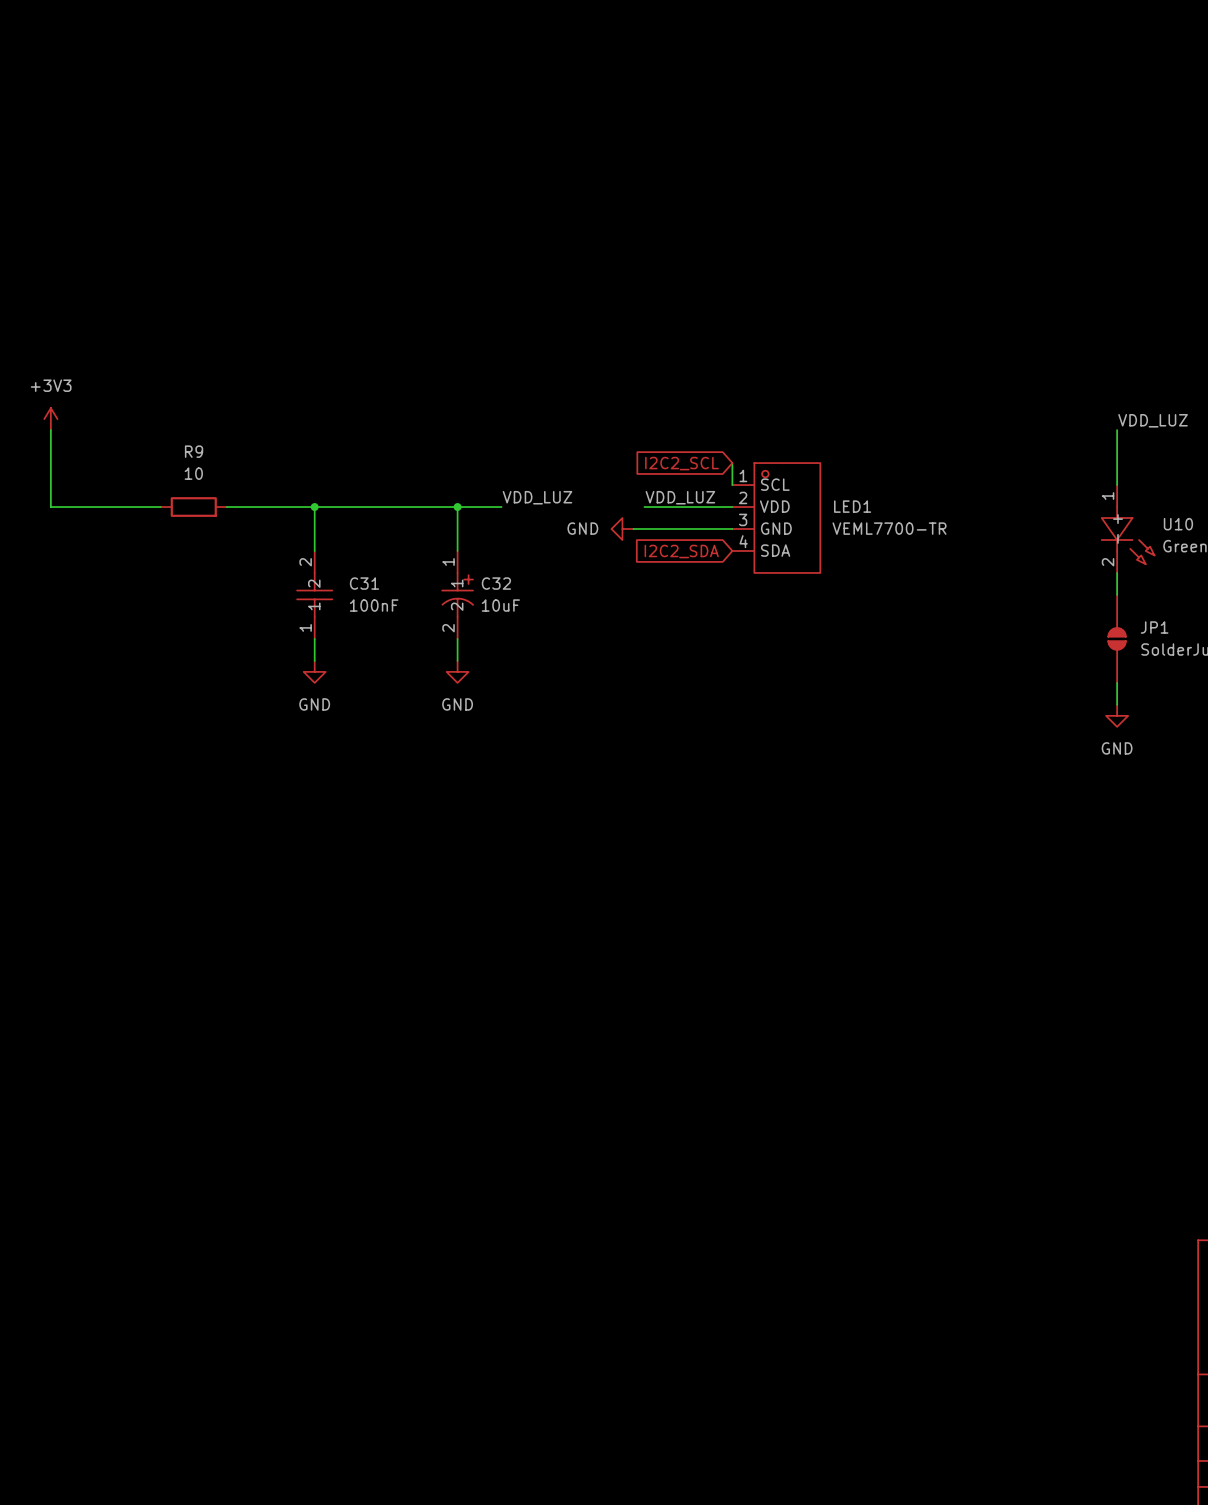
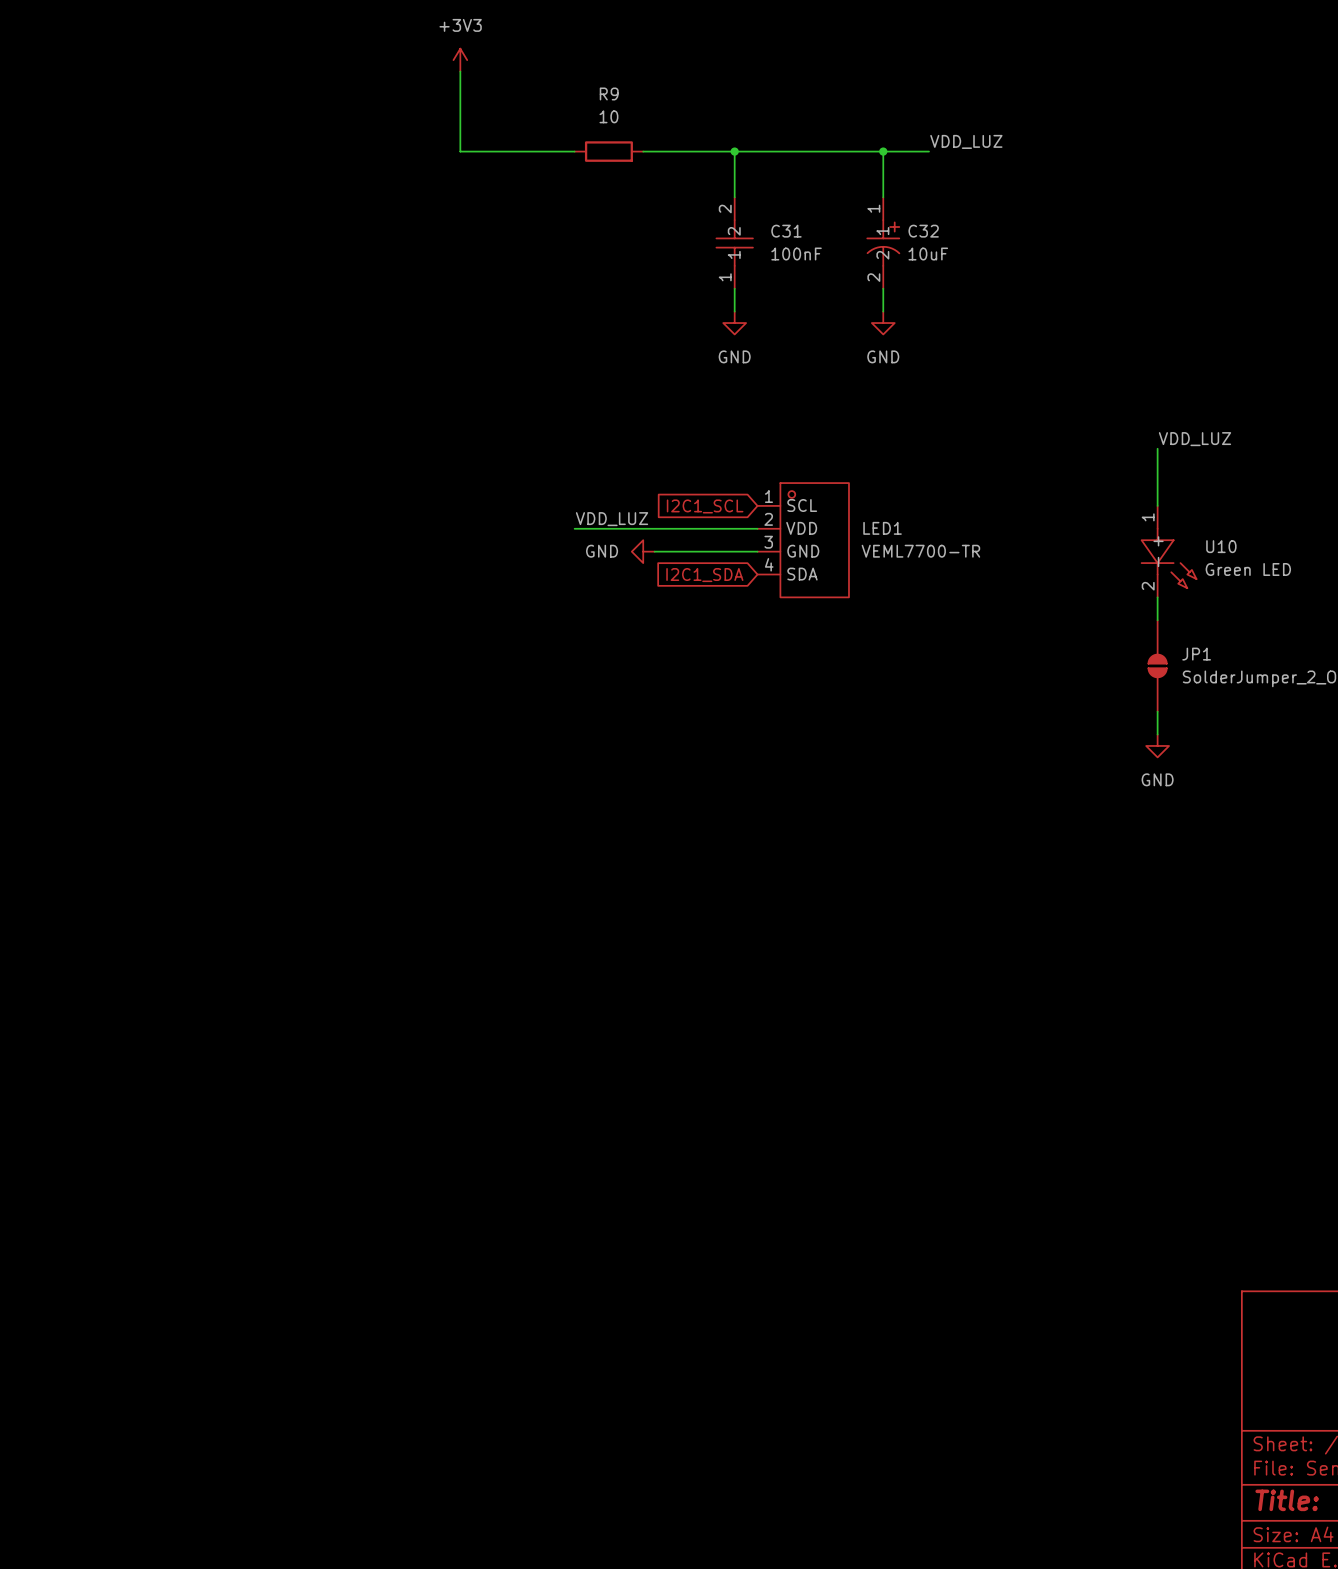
power symbol: none -> +3V3 (460, 60)
wire: none -> (460, 71) (460, 151) (574, 151)
label: none -> VDD_LUZ (966, 141)
wire: none -> (643, 151) (929, 151)
wire: none -> (734, 151) (734, 197)
junction: none -> (734, 151)
wire: none -> (883, 151) (883, 197)
junction: none -> (883, 151)
wire: none -> (883, 288) (883, 311)
power symbol: none -> GND (734, 323)
power symbol: none -> GND (883, 323)
power symbol: +3V3 (50, 419) -> none
wire: (50, 430) (50, 507) (160, 507) -> none
global label: I2C2_SCL (681, 463) -> I2C1_SCL (705, 506)
wire: (732, 463) (732, 485) -> (734, 288) (734, 311)
label position: VDD_LUZ (537, 497) -> VDD_LUZ (612, 519)
label: VDD_LUZ (680, 497) -> none
R9 position: (193, 507) -> (608, 151)
wire: (226, 507) (501, 507) -> none
wire: (314, 507) (314, 550) -> none
junction: (314, 507) -> none
wire: (457, 507) (457, 550) -> none
junction: (457, 507) -> none
wire: none -> (574, 528) (666, 528)
global label: I2C2_SDA (681, 551) -> I2C1_SDA (704, 575)
C31 position: (314, 594) -> (734, 243)
C32 position: (457, 594) -> (883, 243)
wire: (314, 638) (314, 660) -> none
wire: (457, 638) (457, 660) -> none
power symbol: GND (314, 671) -> none
power symbol: GND (457, 671) -> none

